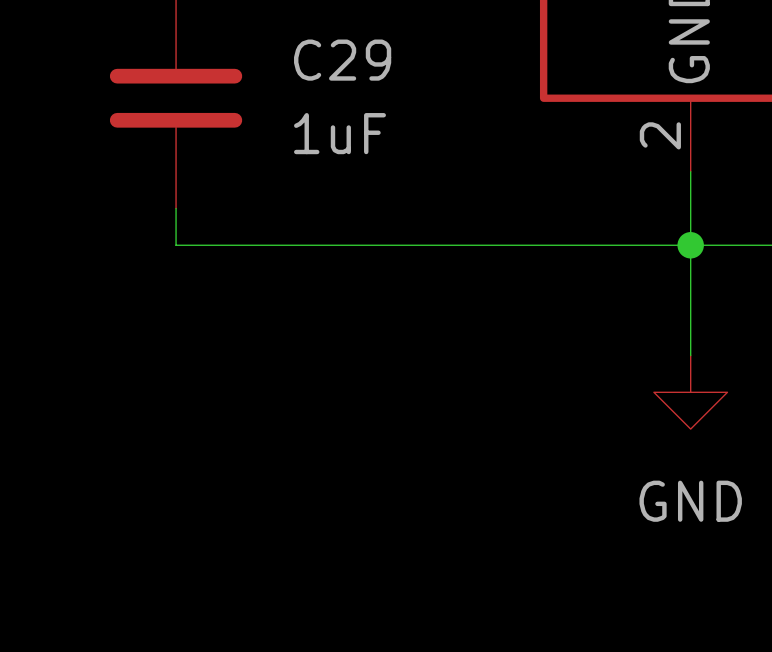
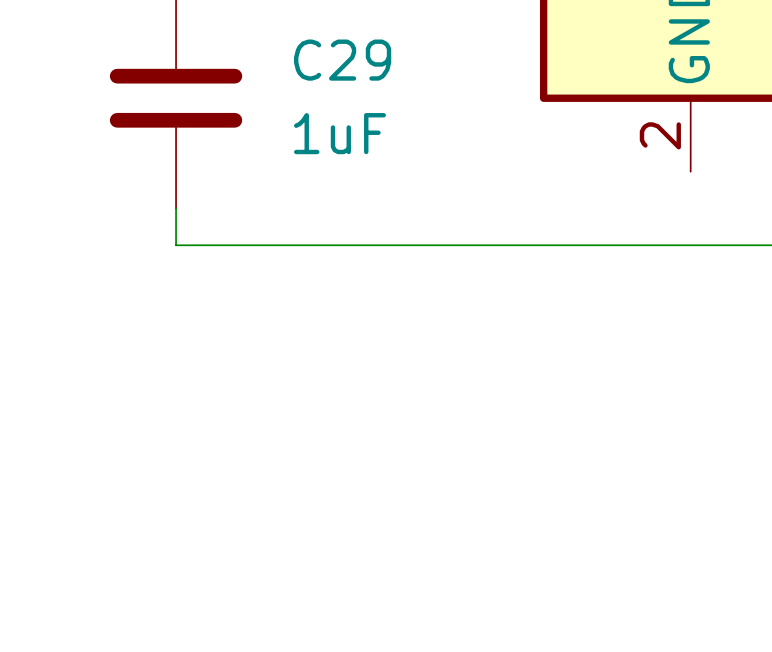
wire: (690, 171) (690, 355) -> none
junction: (690, 245) -> none
power symbol: GND (690, 392) -> none

